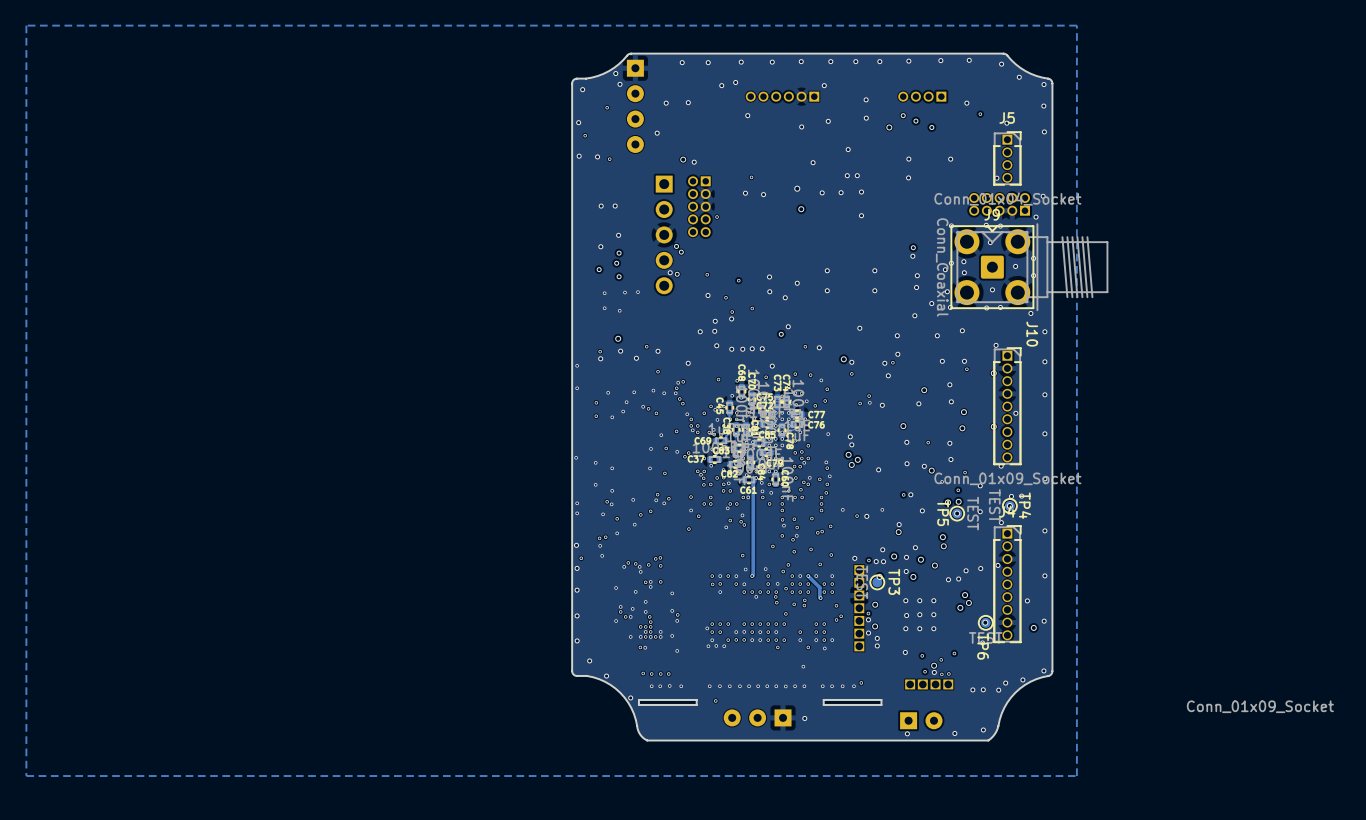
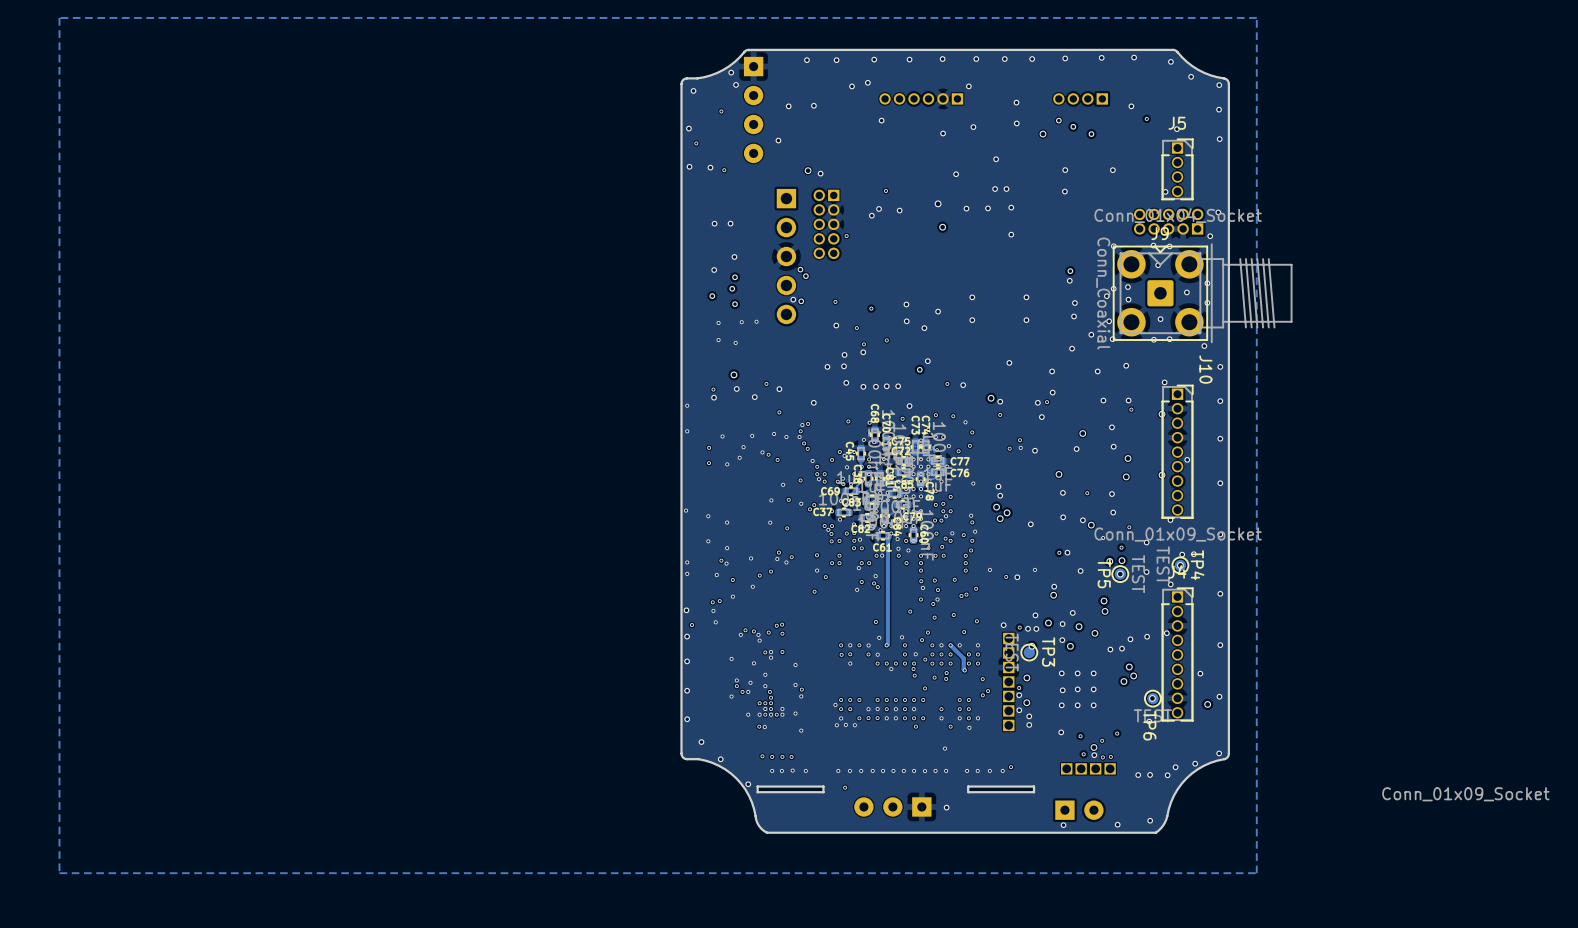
via: none -> (871, 215)

